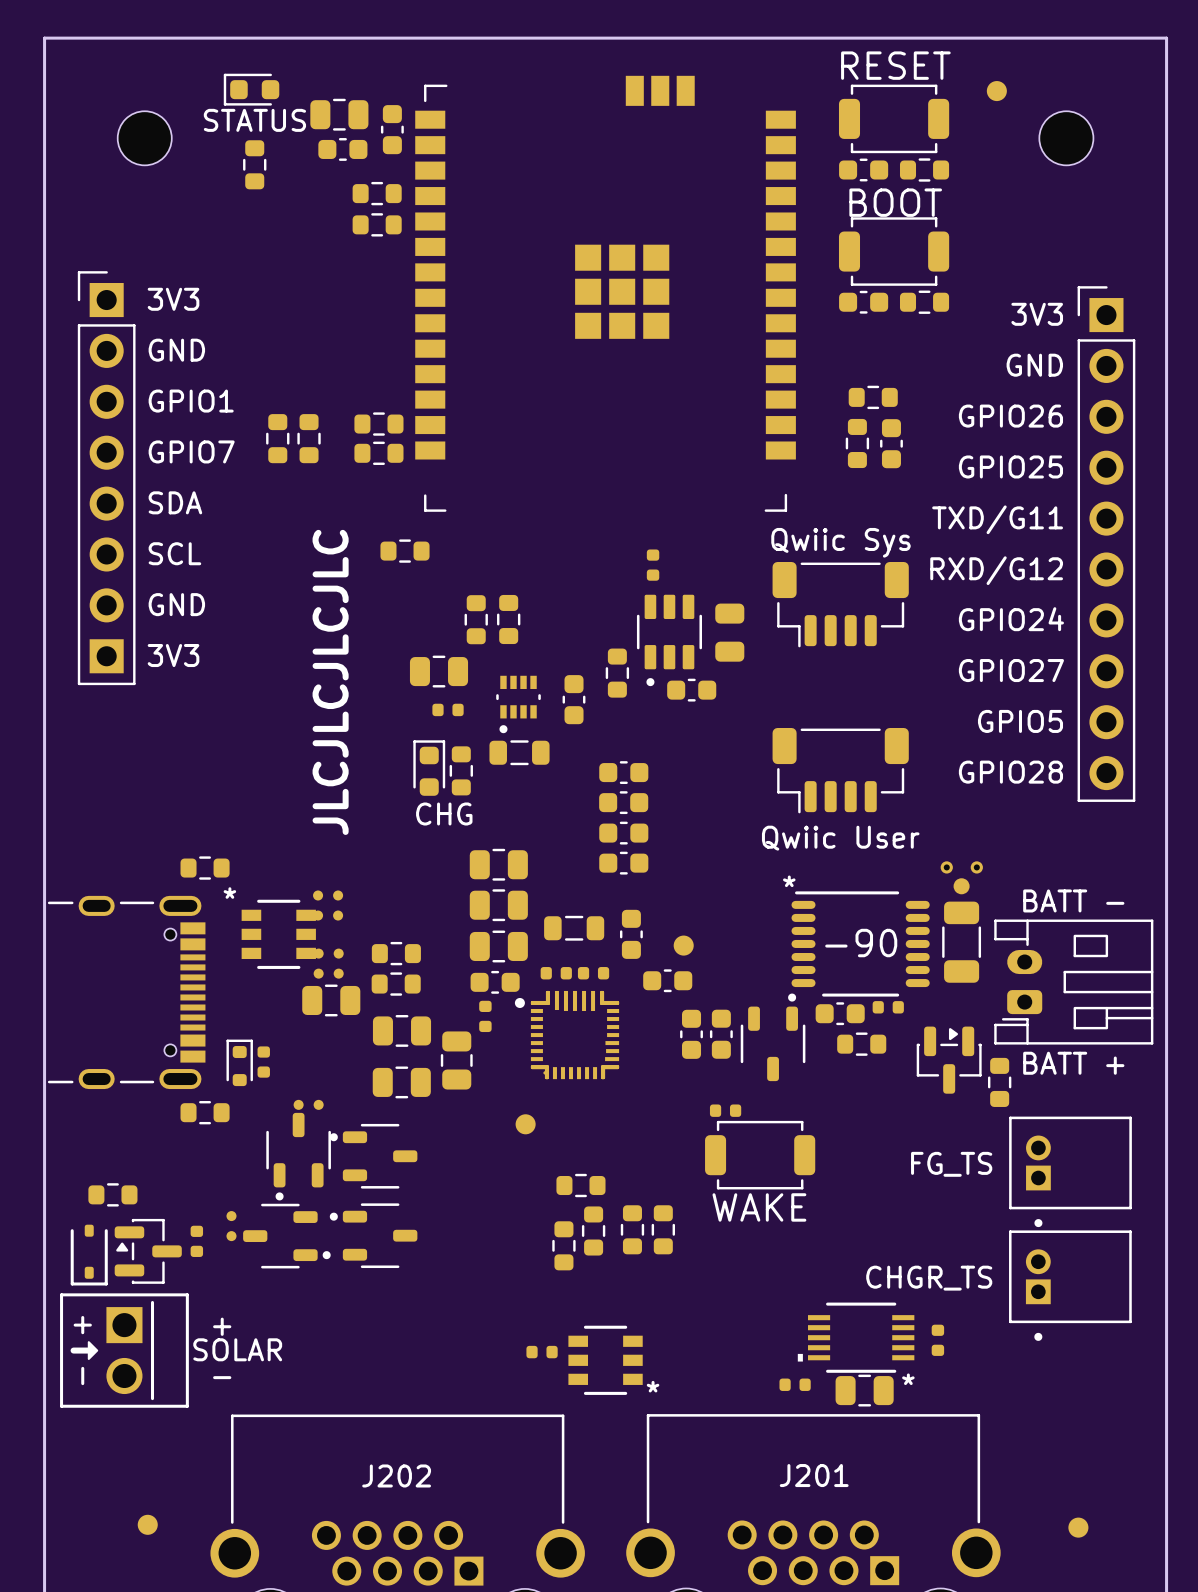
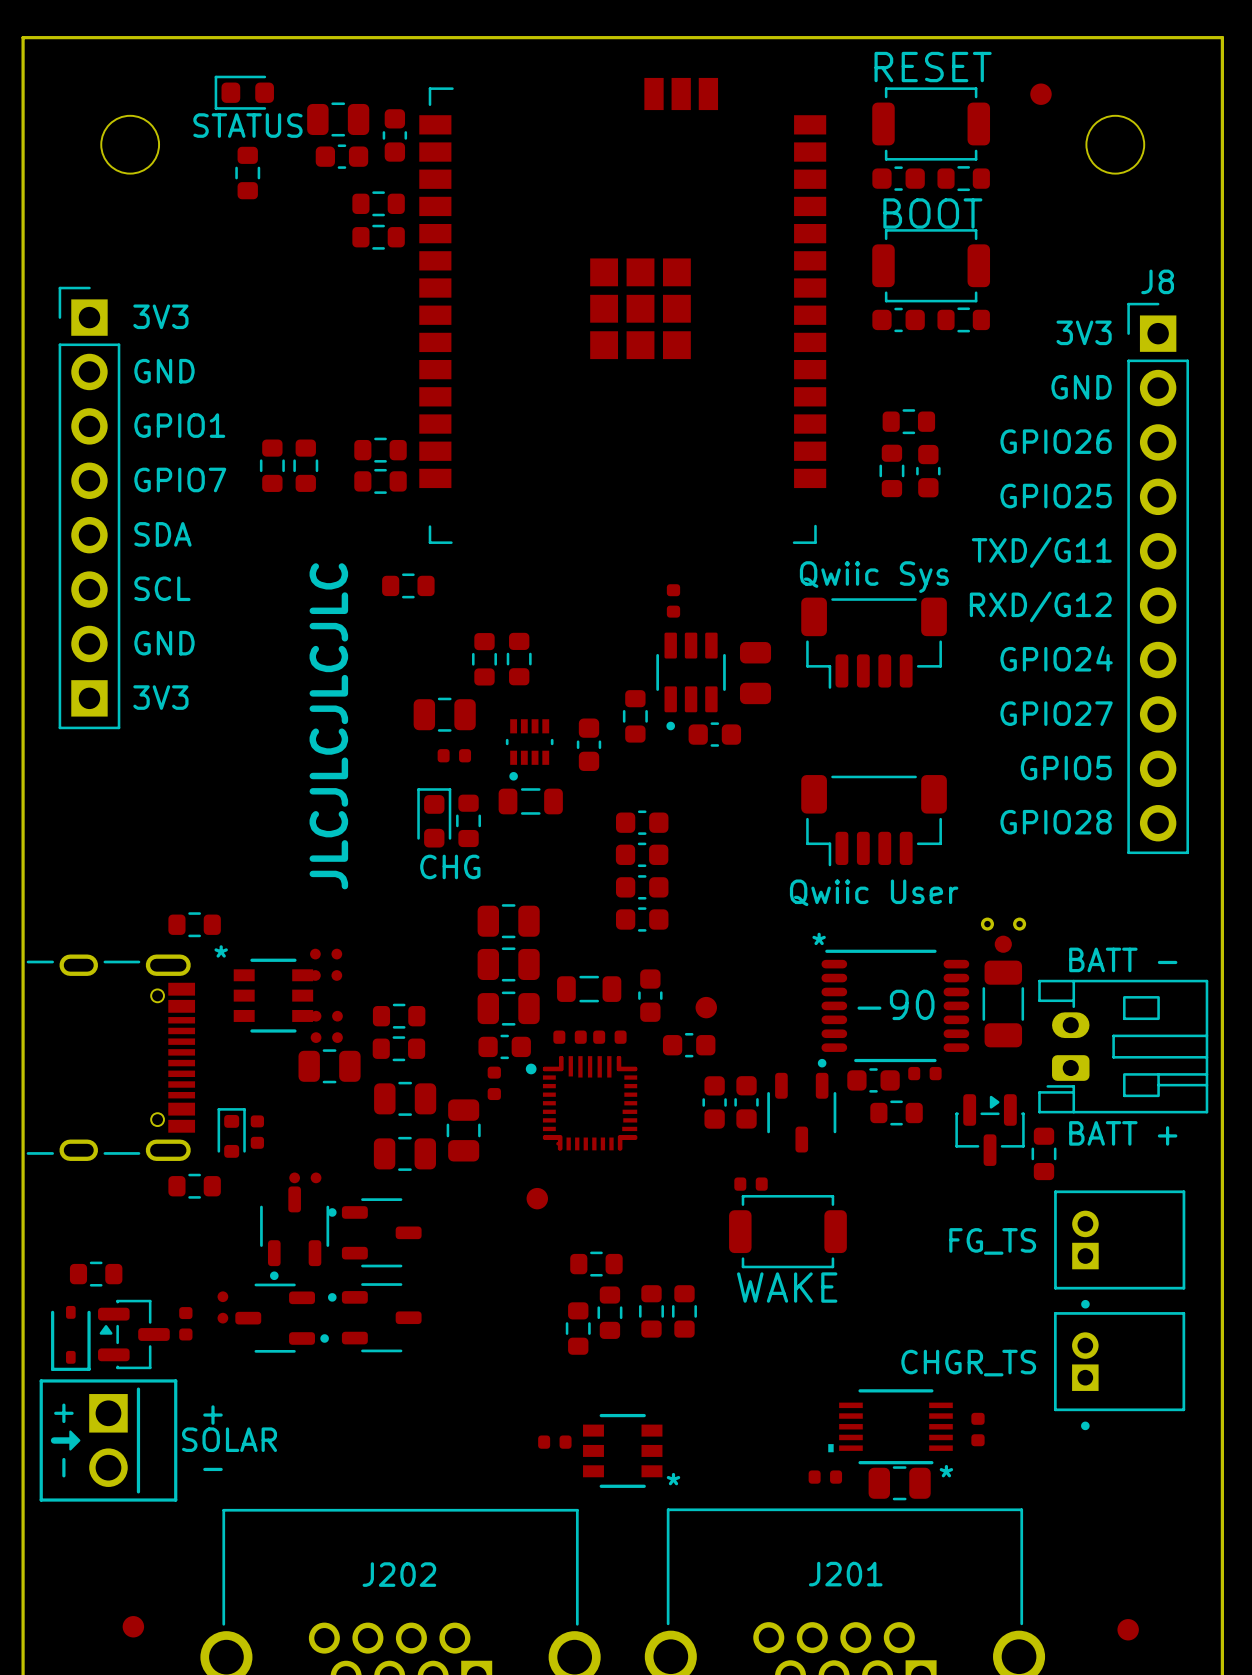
J8 name: none -> J8 (1157, 281)

